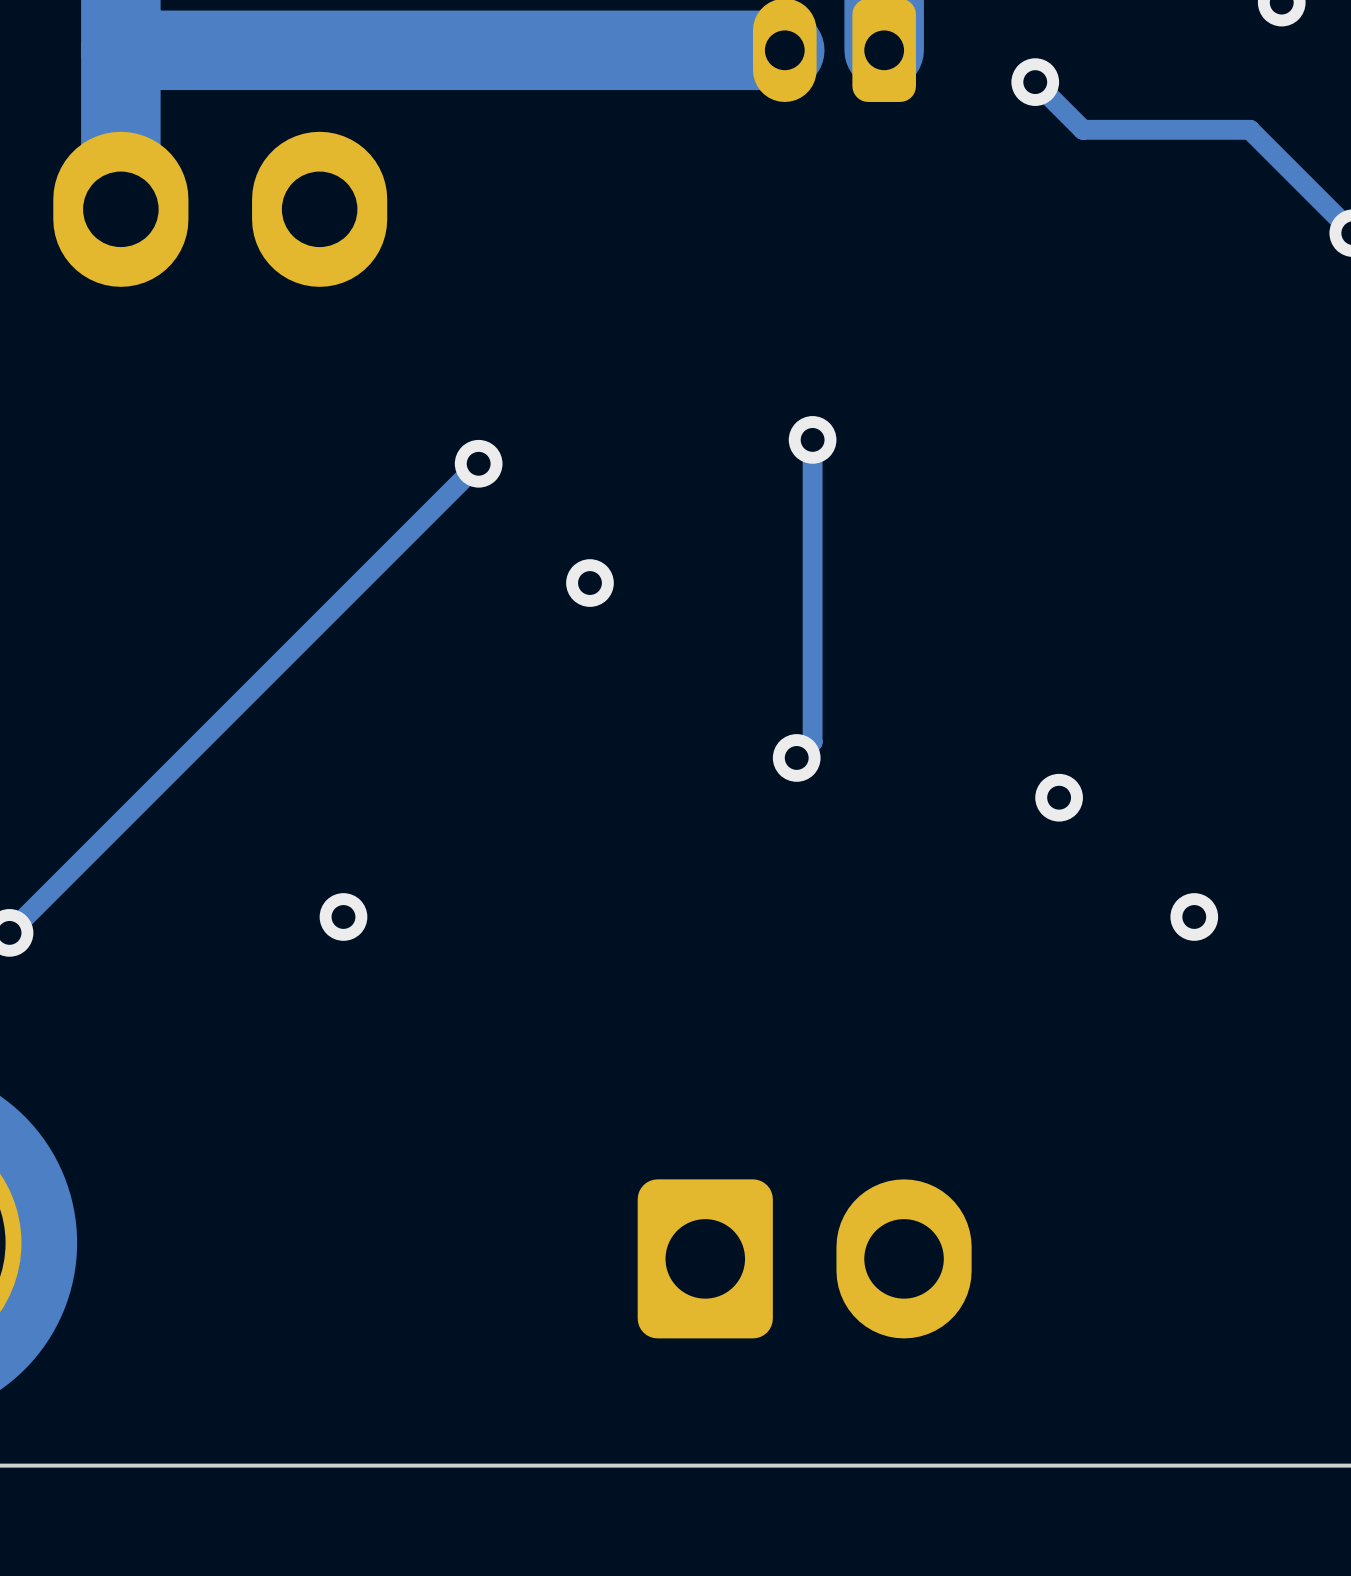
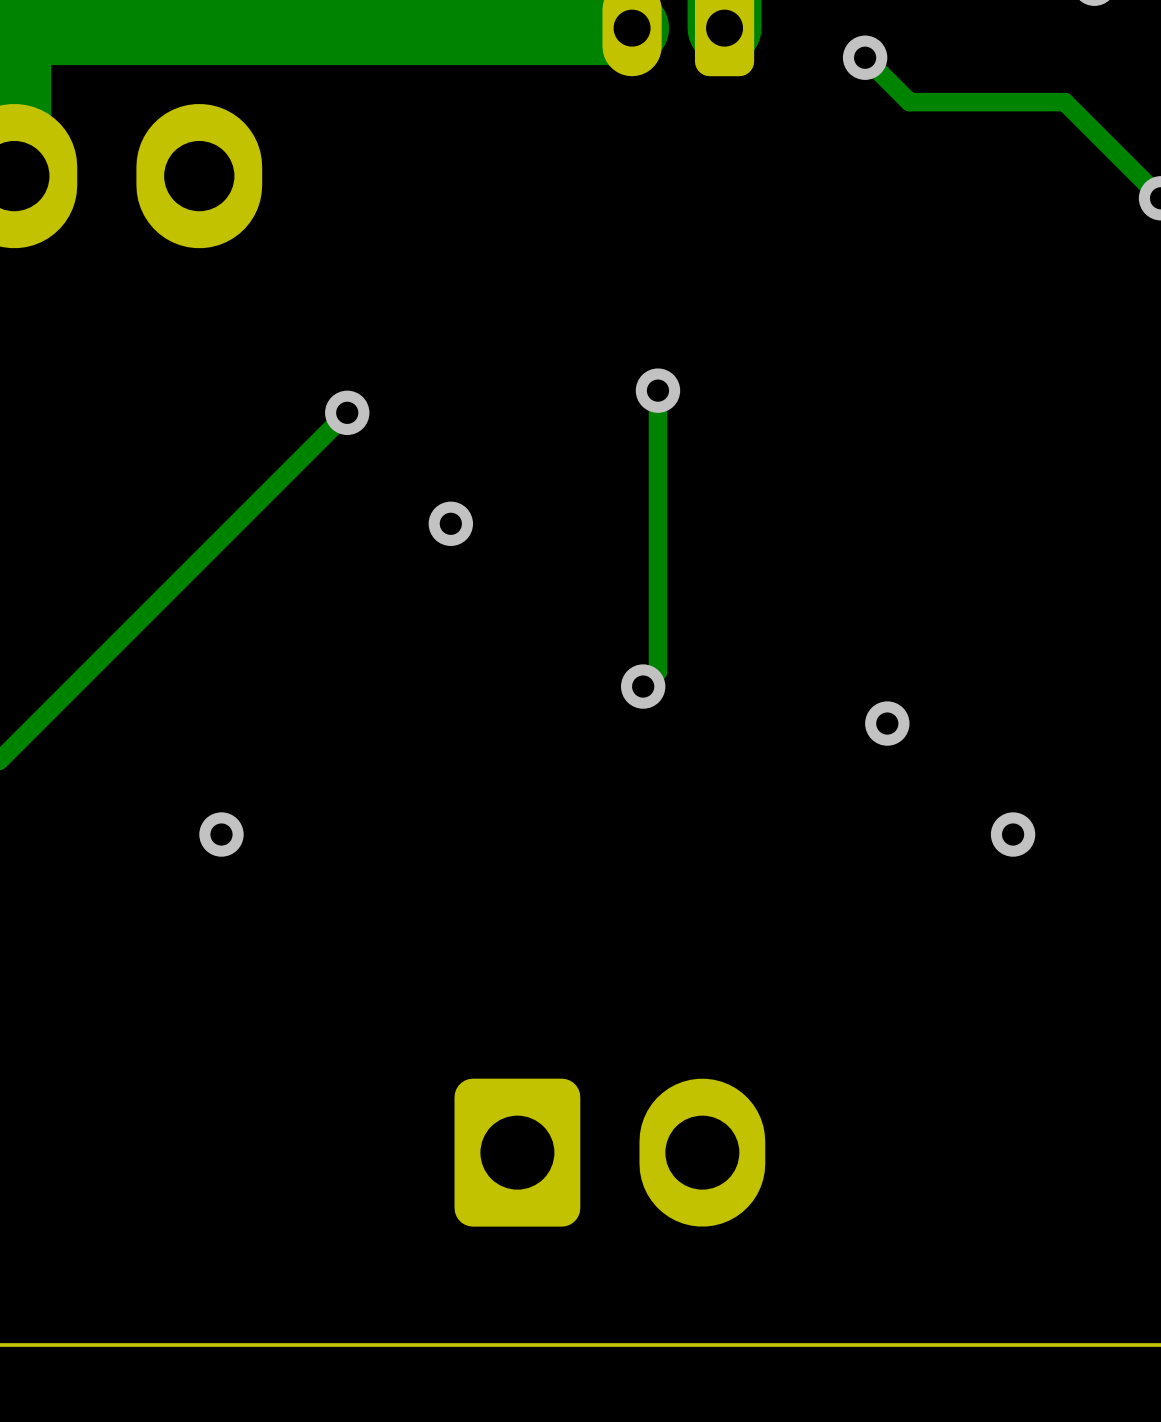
part position: (804, 1258) -> (609, 1152)

